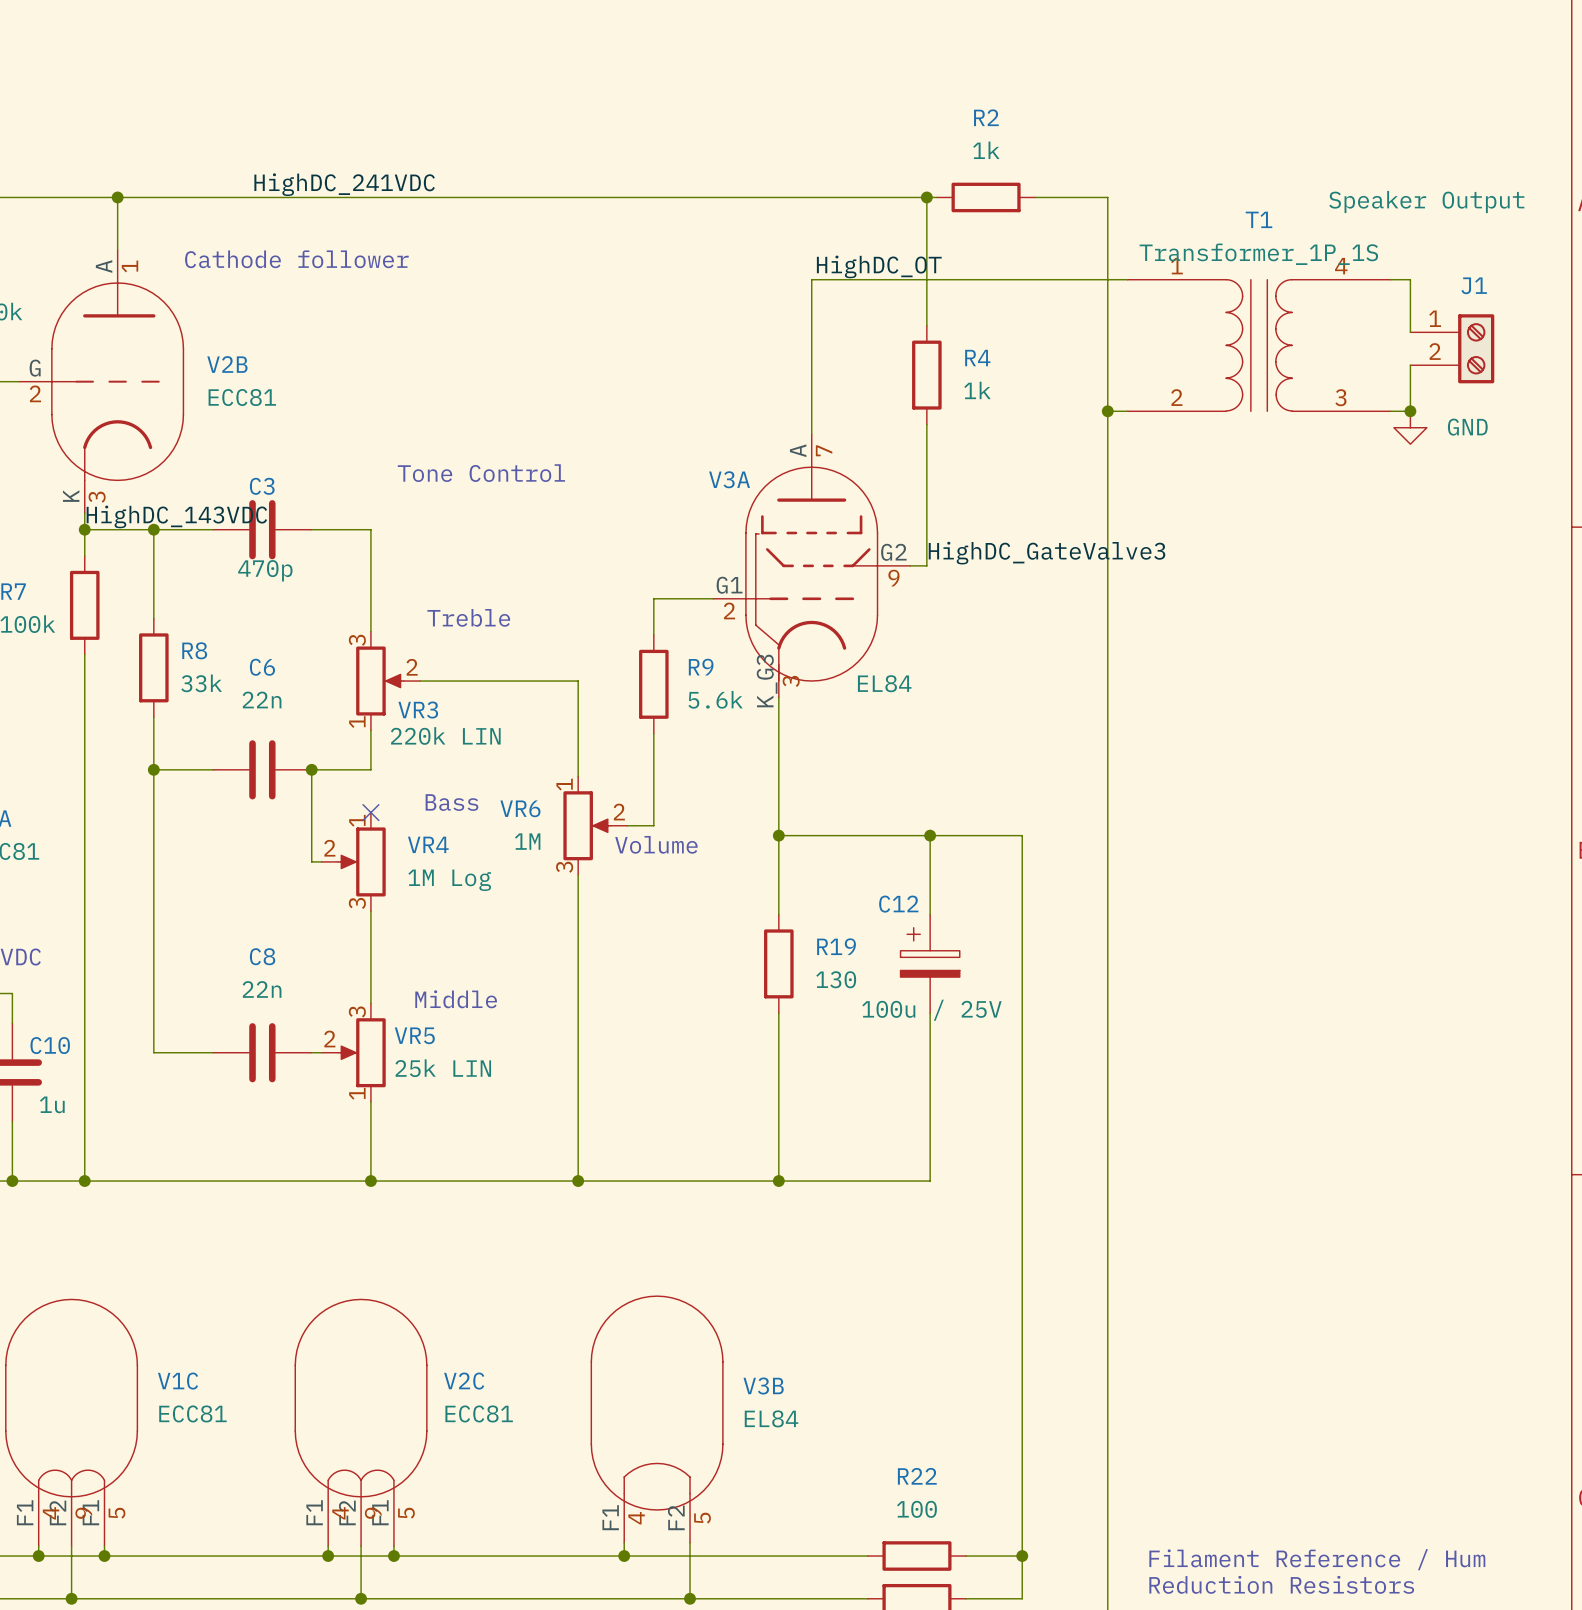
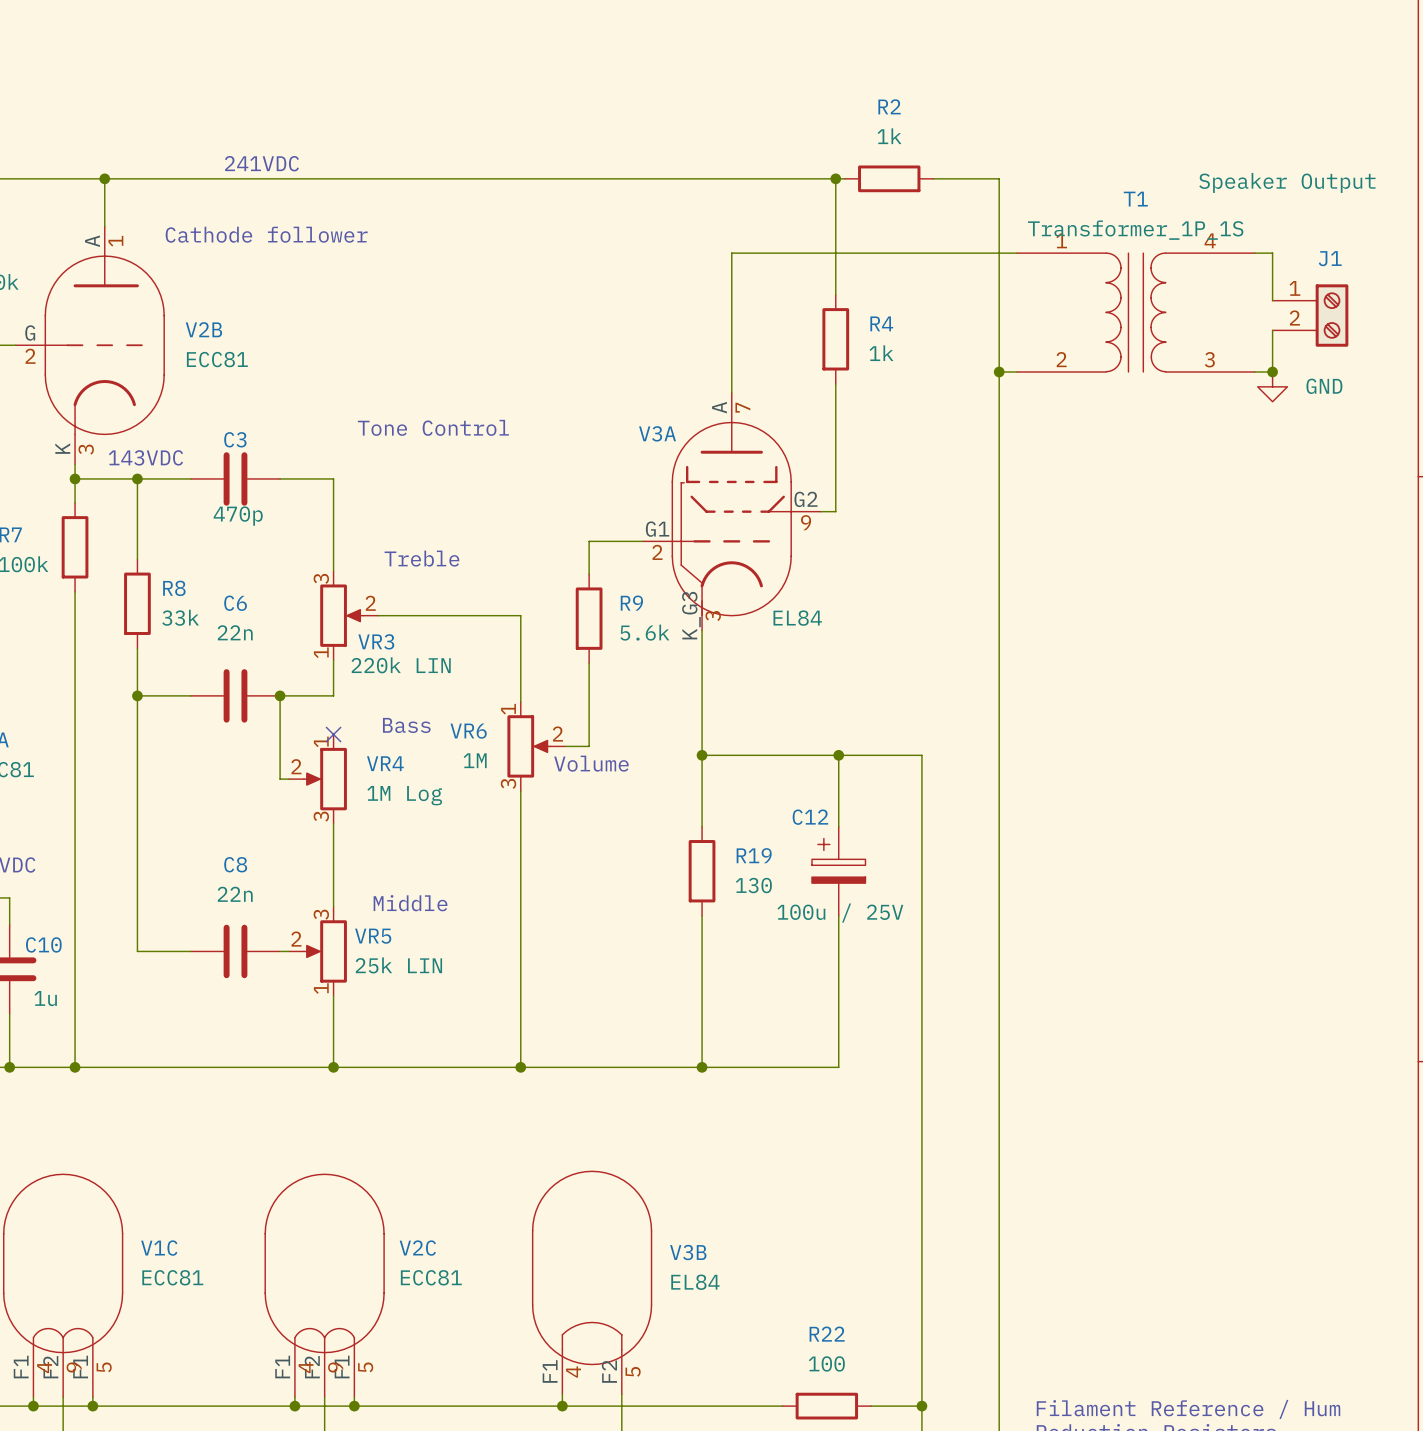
text: none -> 241VDC (261, 163)
label: HighDC_241VDC (344, 184) -> none
label: HighDC_OT (879, 266) -> none
text: none -> 143VDC (145, 457)
label: HighDC_143VDC (176, 516) -> none
label: HighDC_GateValve3 (1047, 553) -> none

